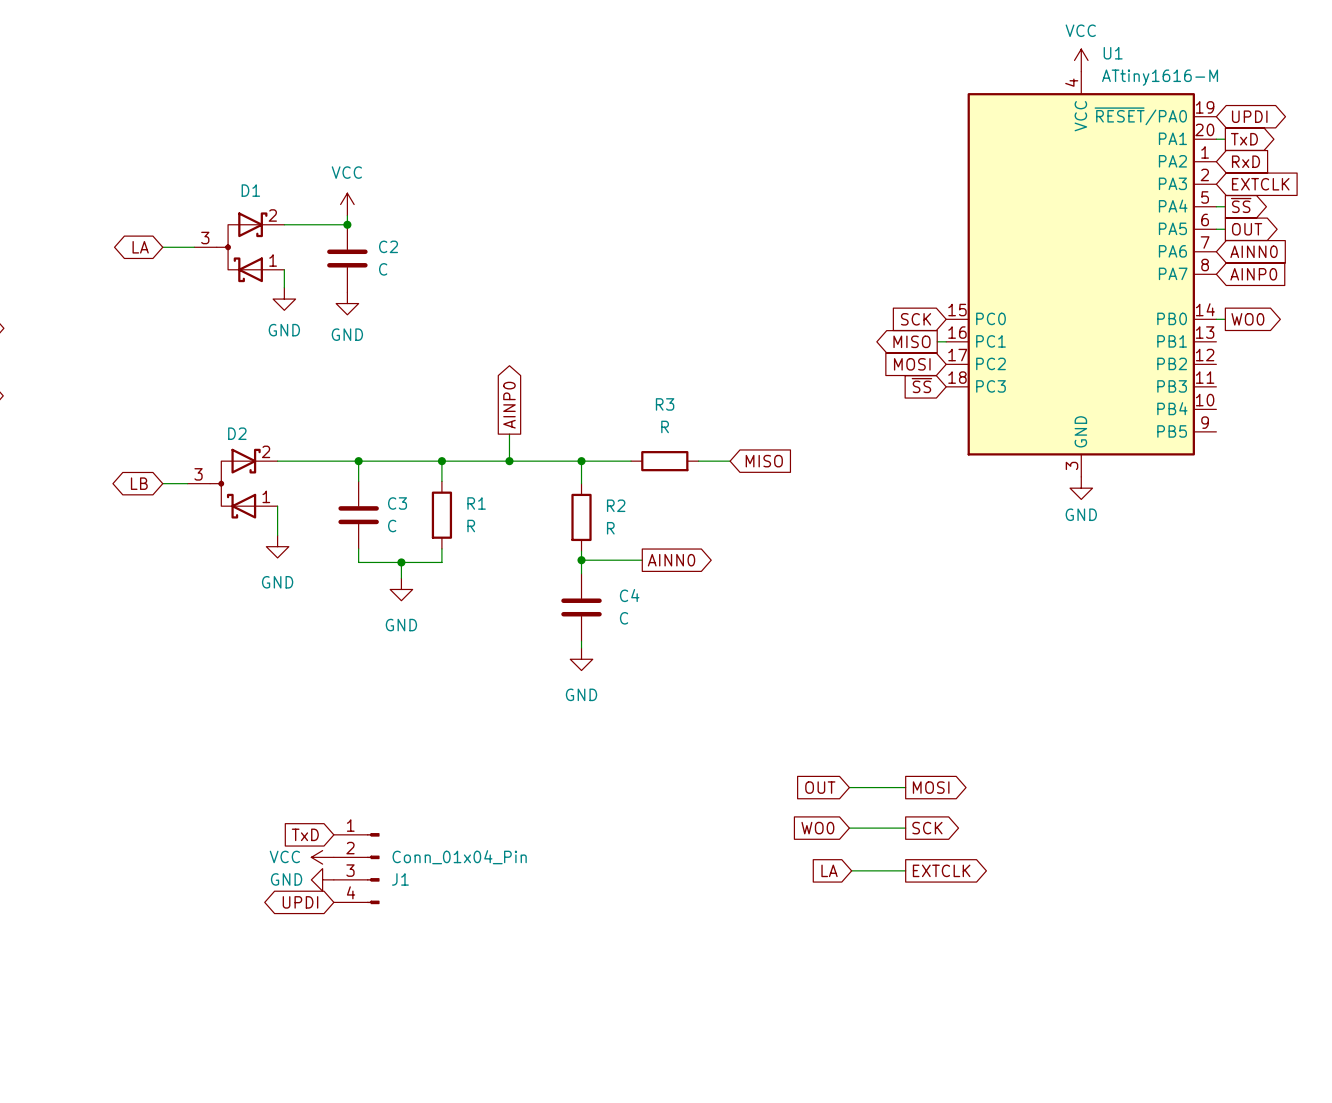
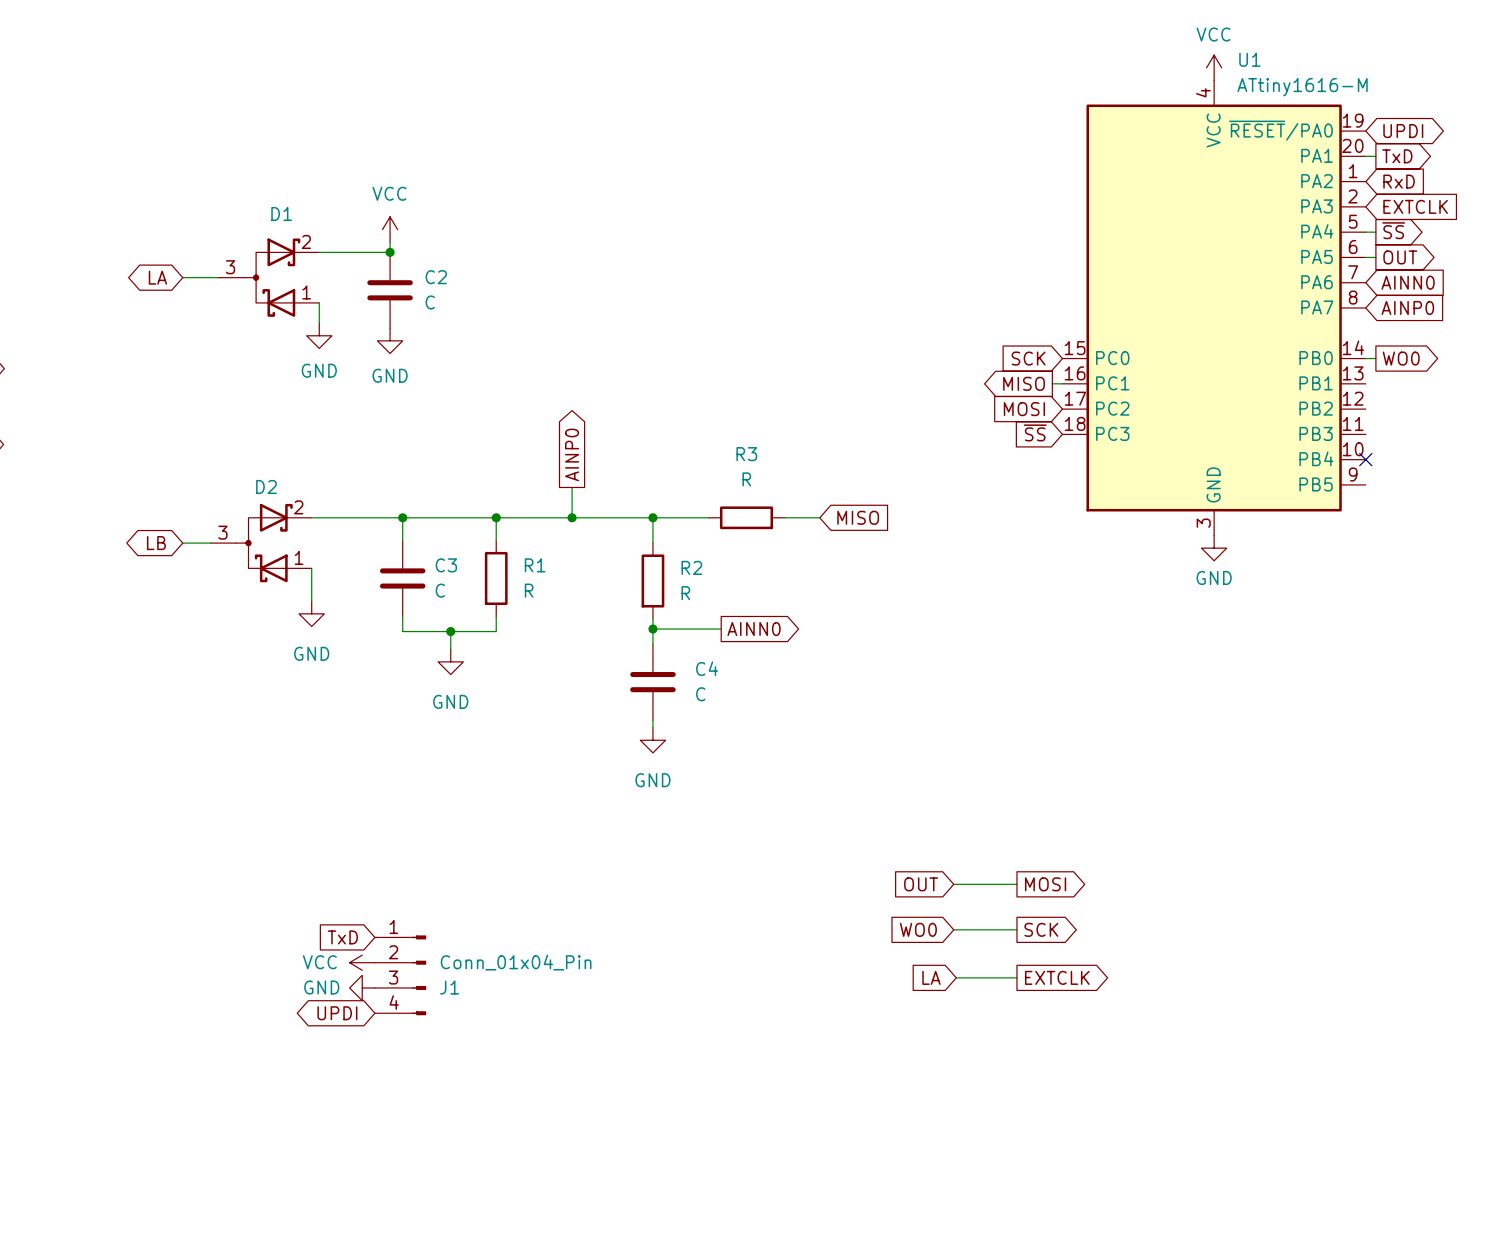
no-connect mark: none -> (1365, 459)

